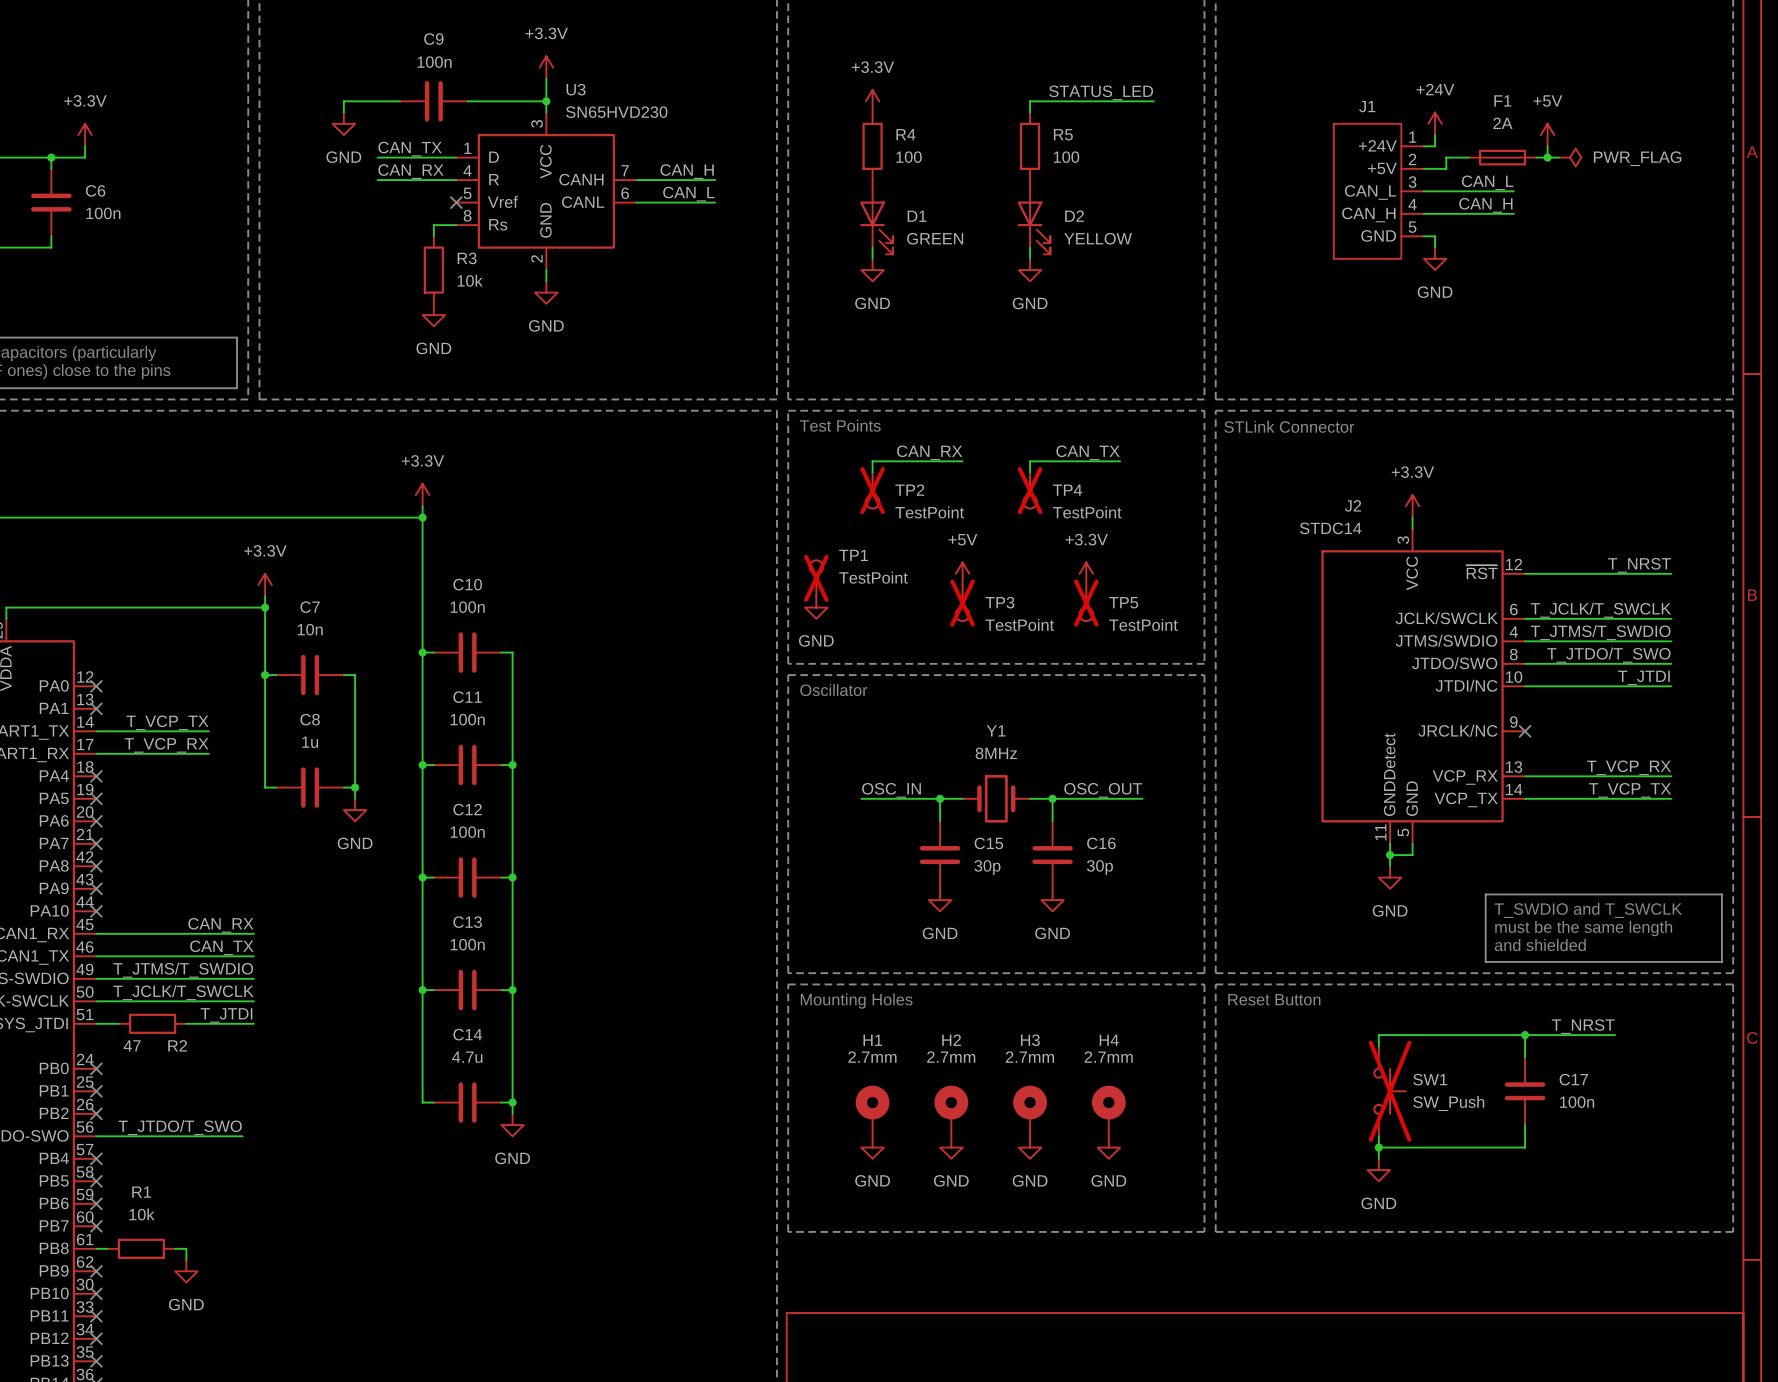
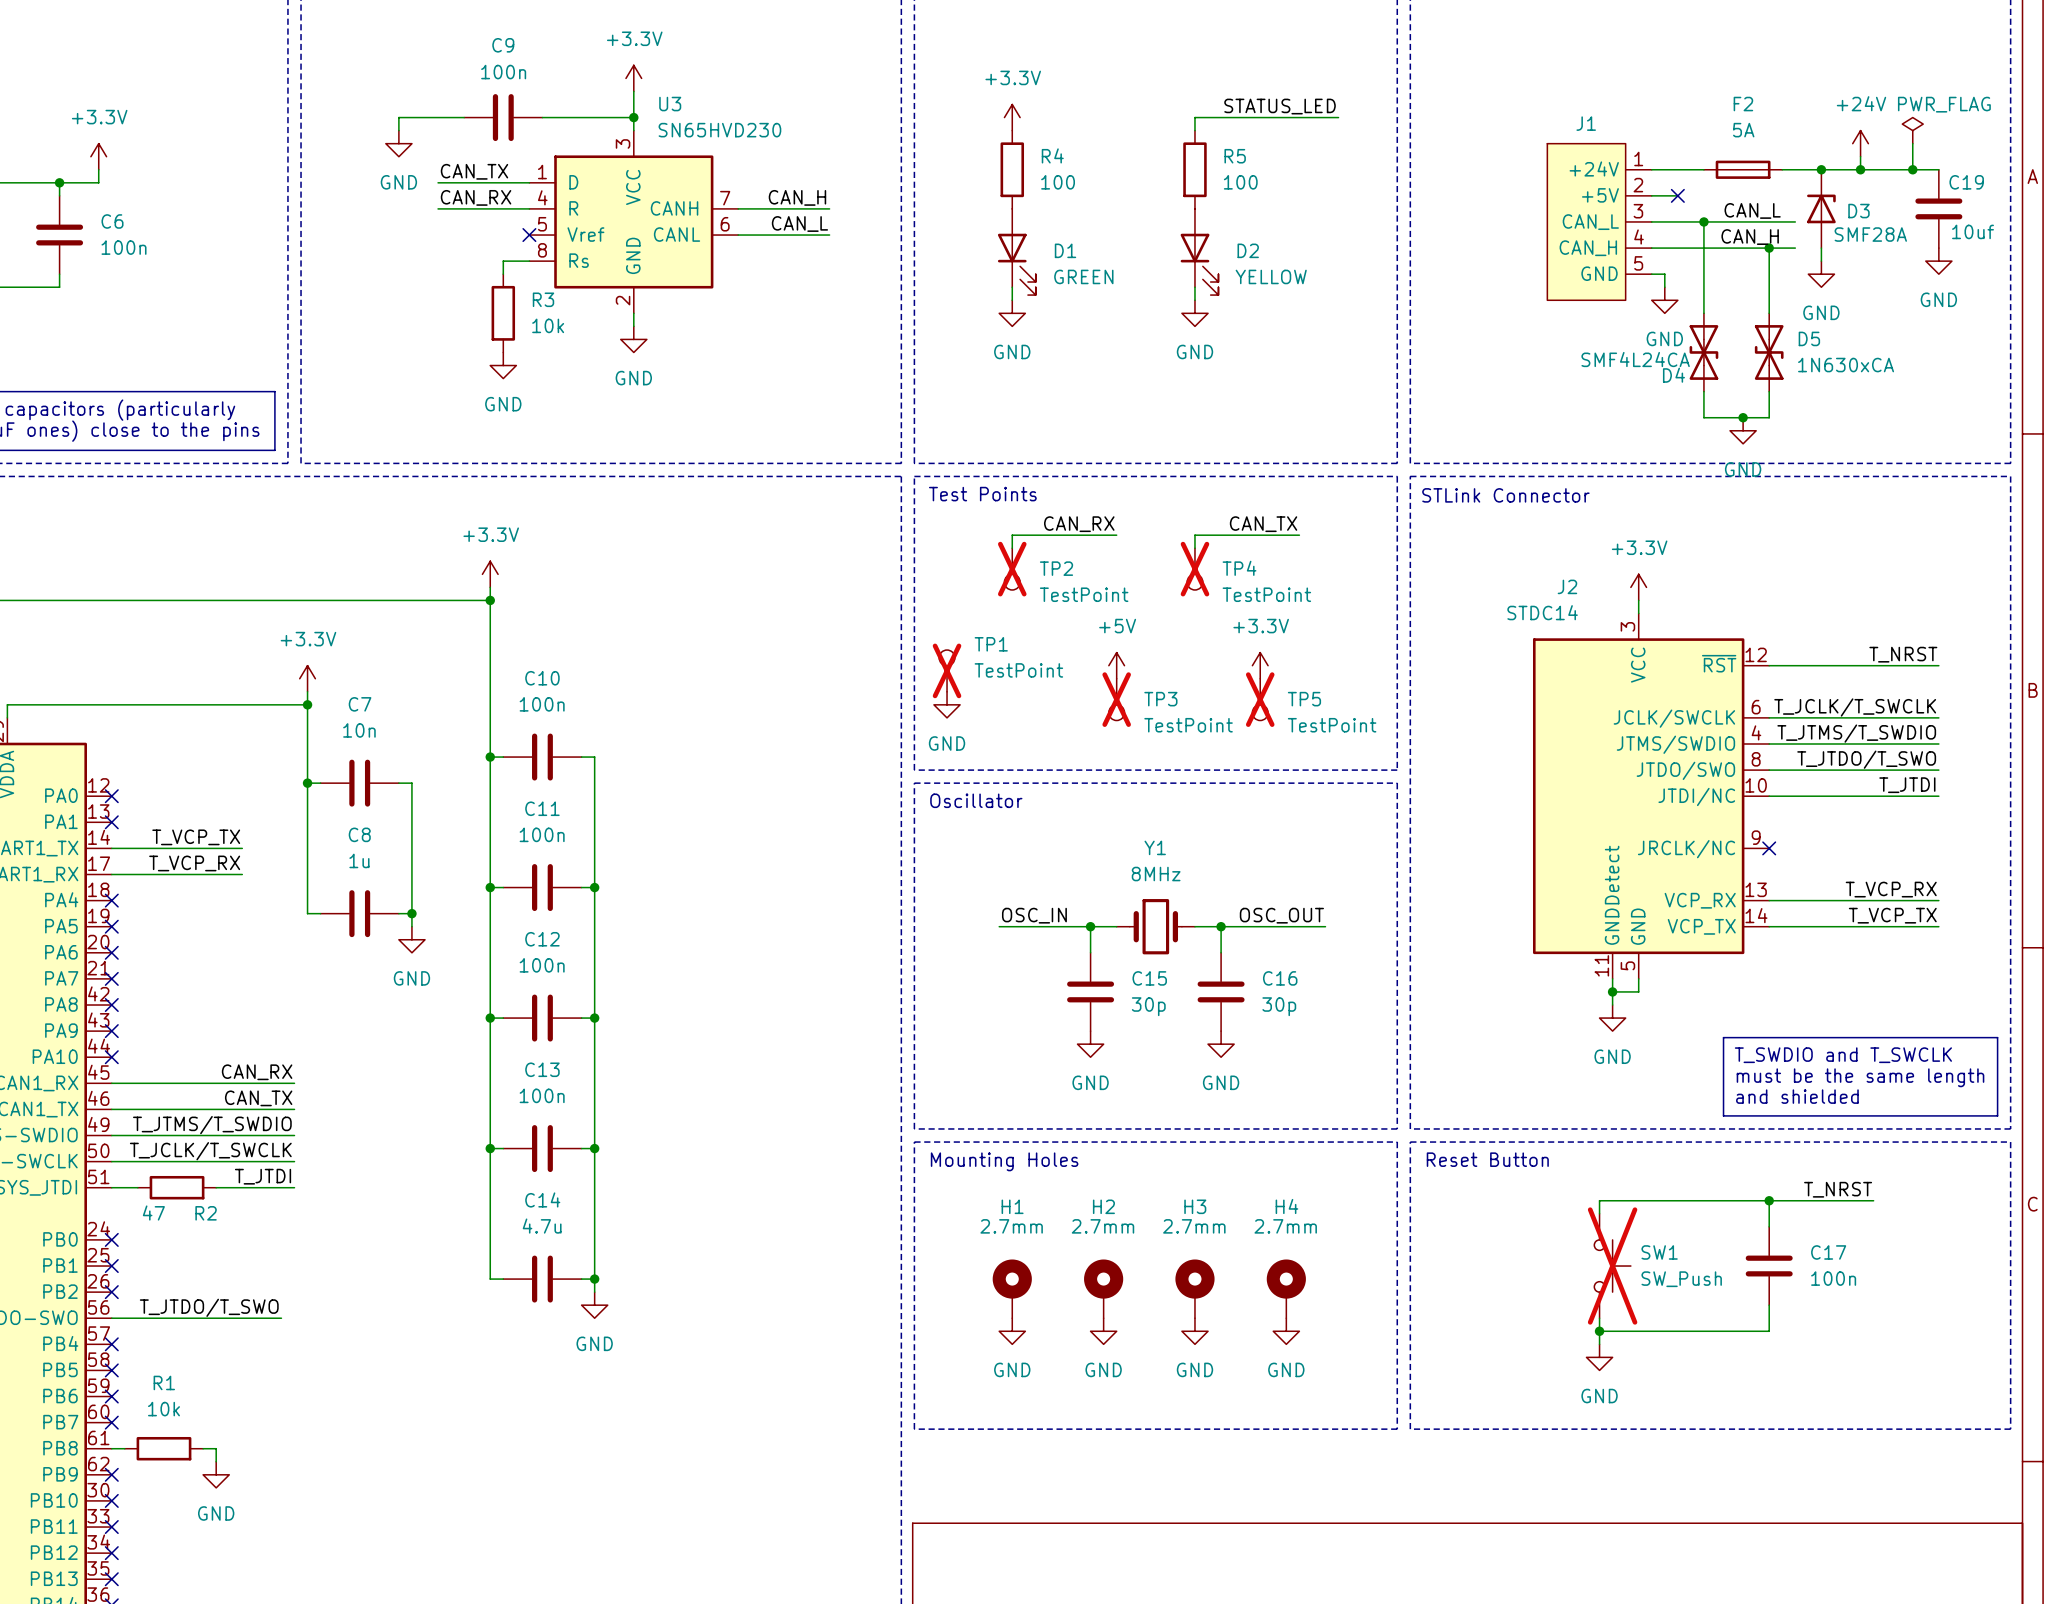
power symbol position: +24V (1435, 123) -> +24V (1860, 143)
wire: none -> (1912, 143) (1912, 169)
wire: (1435, 135) (1435, 146) -> (1703, 169) (1664, 169)
power symbol: +5V (1547, 135) -> none
F2: none -> 5A (1743, 169)
wire: none -> (1782, 169) (1938, 169)
wire: (1547, 146) (1547, 157) -> (1860, 156) (1860, 169)
junction: none -> (1860, 169)
junction: none -> (1912, 169)
wire: (1468, 157) (1446, 157) (1446, 168) -> none
F1: 2A (1502, 157) -> none
wire: (1536, 157) (1558, 157) -> none
junction position: (1547, 157) -> (1821, 169)
power symbol rotation: 0° (1570, 157) -> 90° counterclockwise (1912, 130)
power symbol position: PWR_FLAG (1570, 157) -> PWR_FLAG (1912, 130)
power symbol text position: PWR_FLAG (1637, 158) -> PWR_FLAG (1944, 104)
no-connect mark: none -> (1677, 195)
D3: none -> SMF28A (1821, 208)
C19: none -> 10uf (1938, 208)
label position: CAN_L (1487, 182) -> CAN_L (1752, 210)
wire: none -> (1703, 221) (1703, 313)
junction: none -> (1703, 221)
wire: none -> (1756, 221) (1795, 221)
label position: CAN_H (1485, 205) -> CAN_H (1750, 237)
wire: none -> (1756, 248) (1795, 248)
wire: none -> (1769, 248) (1769, 313)
junction: none -> (1769, 248)
wire: none -> (1821, 248) (1821, 261)
power symbol: none -> GND (1938, 261)
power symbol: none -> GND (1821, 274)
D4: none -> SMF4L24CA (1703, 352)
D5: none -> 1N630xCA (1769, 352)
wire: none -> (1703, 391) (1703, 417) (1769, 417) (1769, 391)
junction: none -> (1743, 417)
power symbol: none -> GND (1743, 430)

